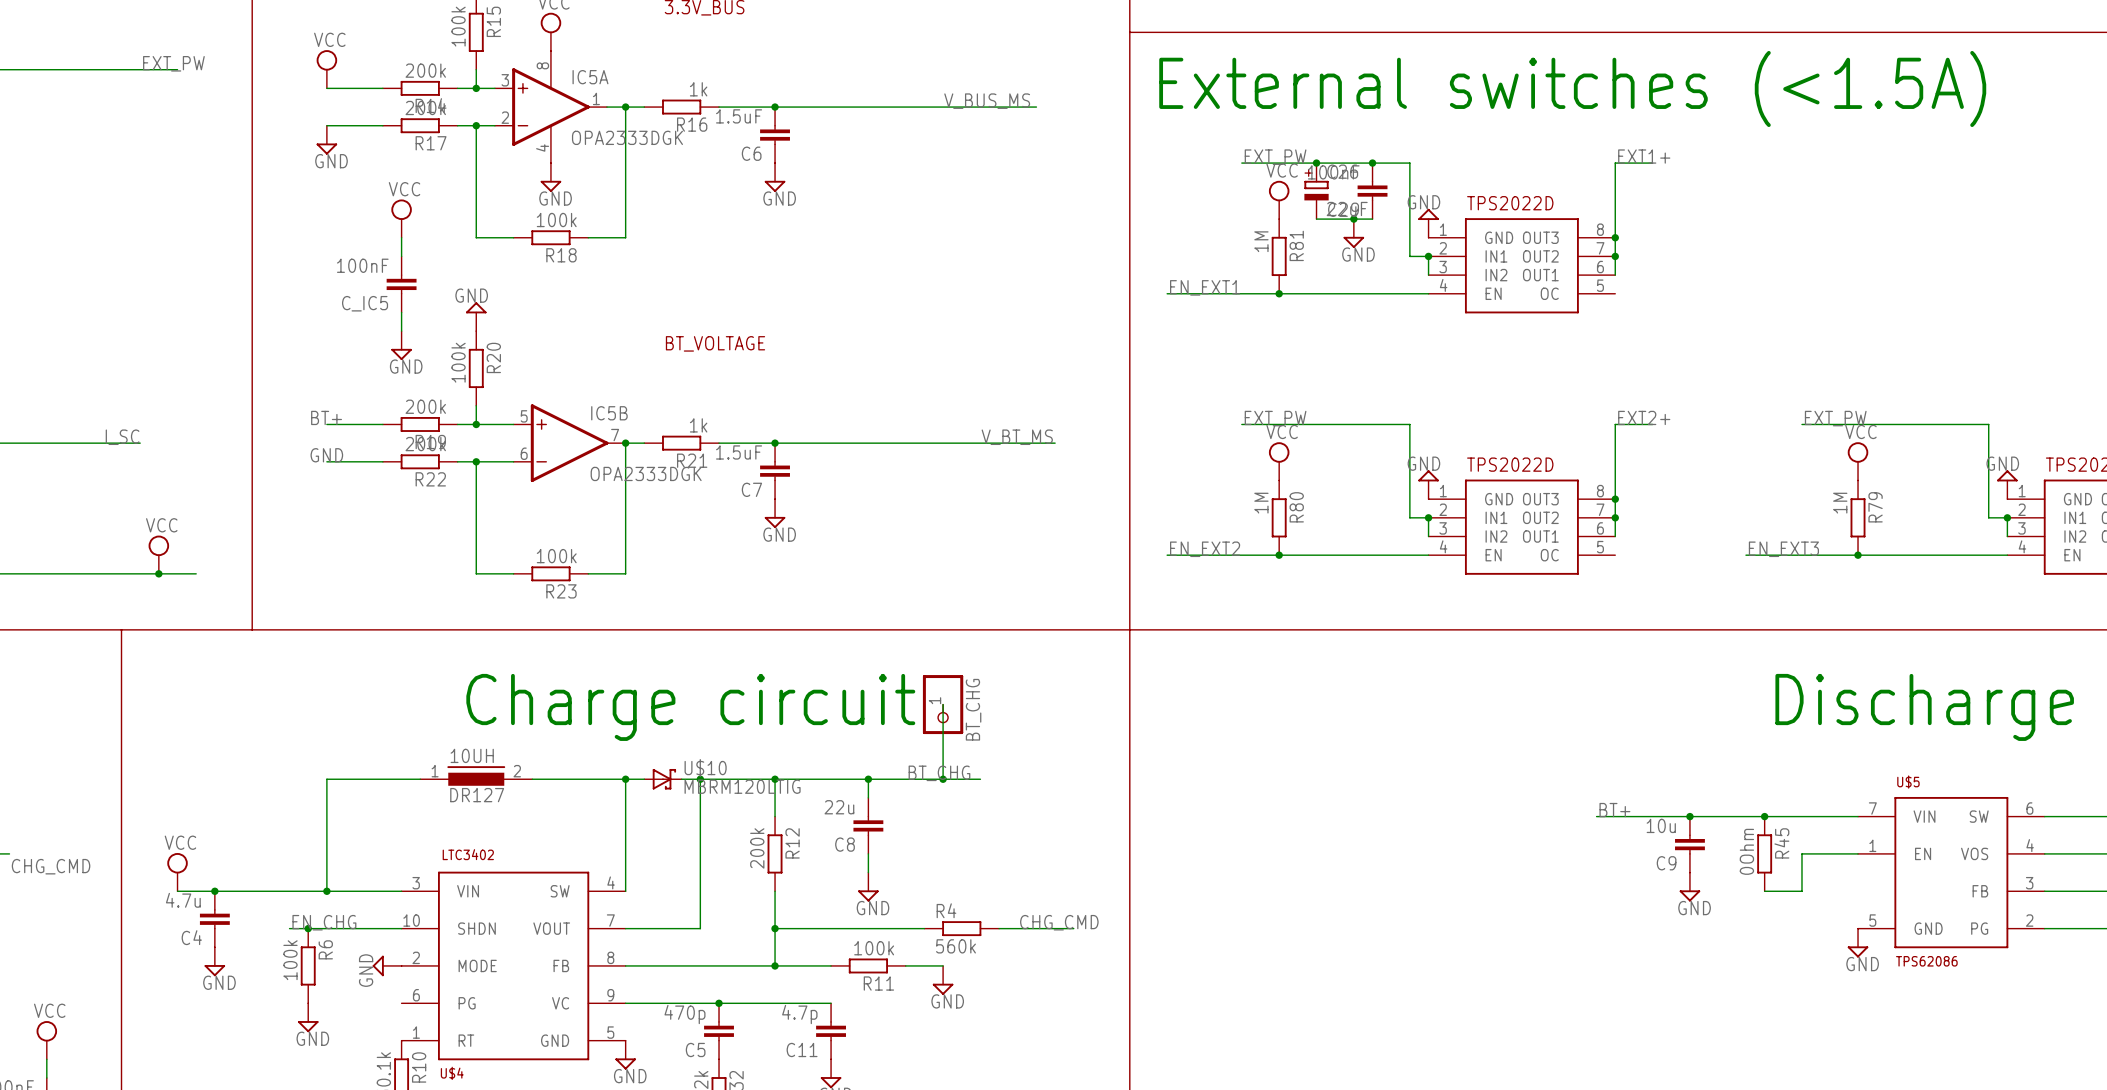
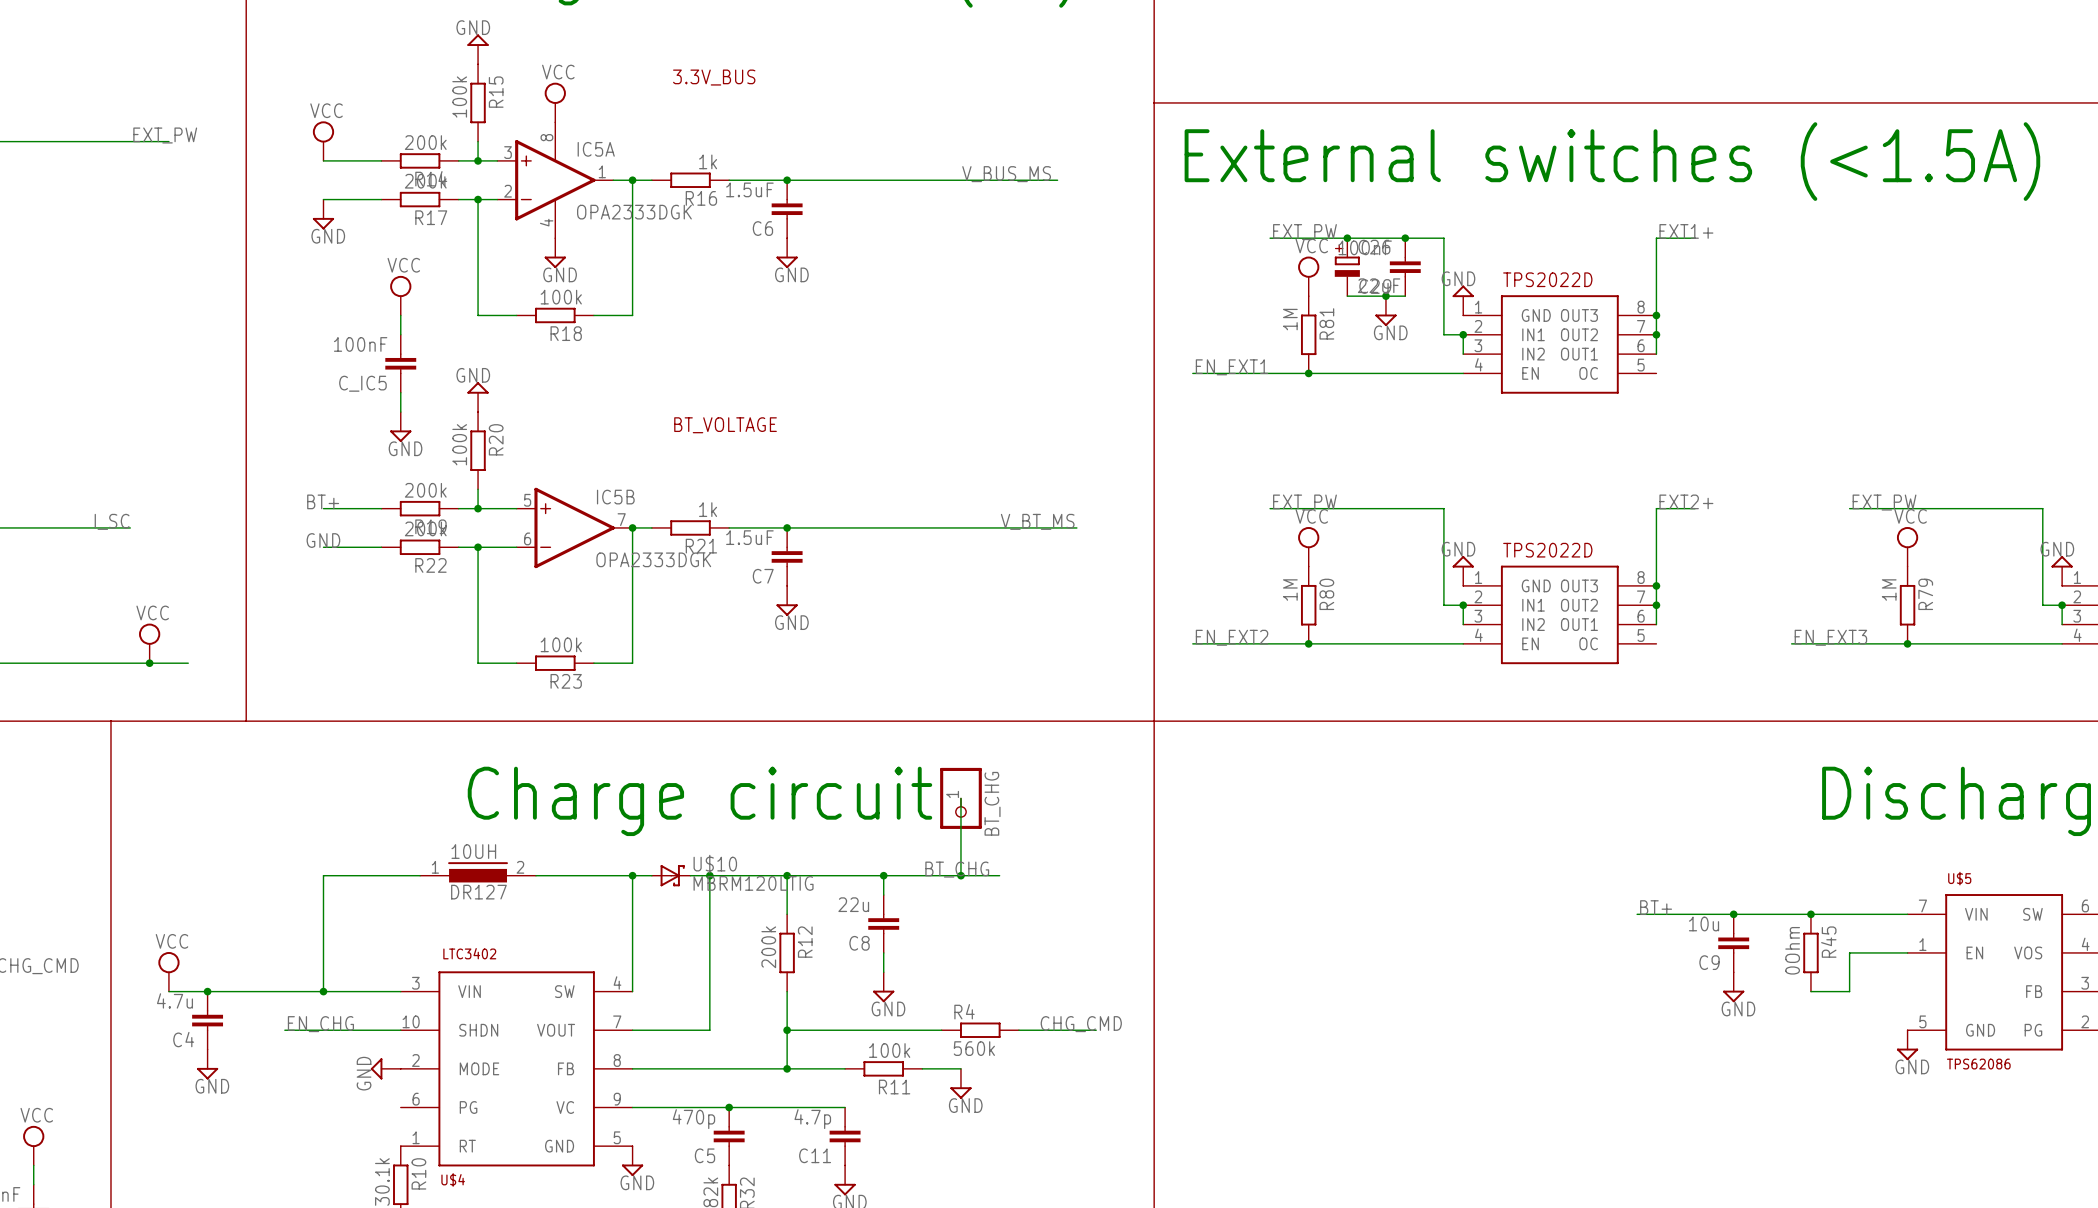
junction: (308, 928) -> none
R6: 100k (308, 965) -> none
power symbol: GND (308, 1017) -> none

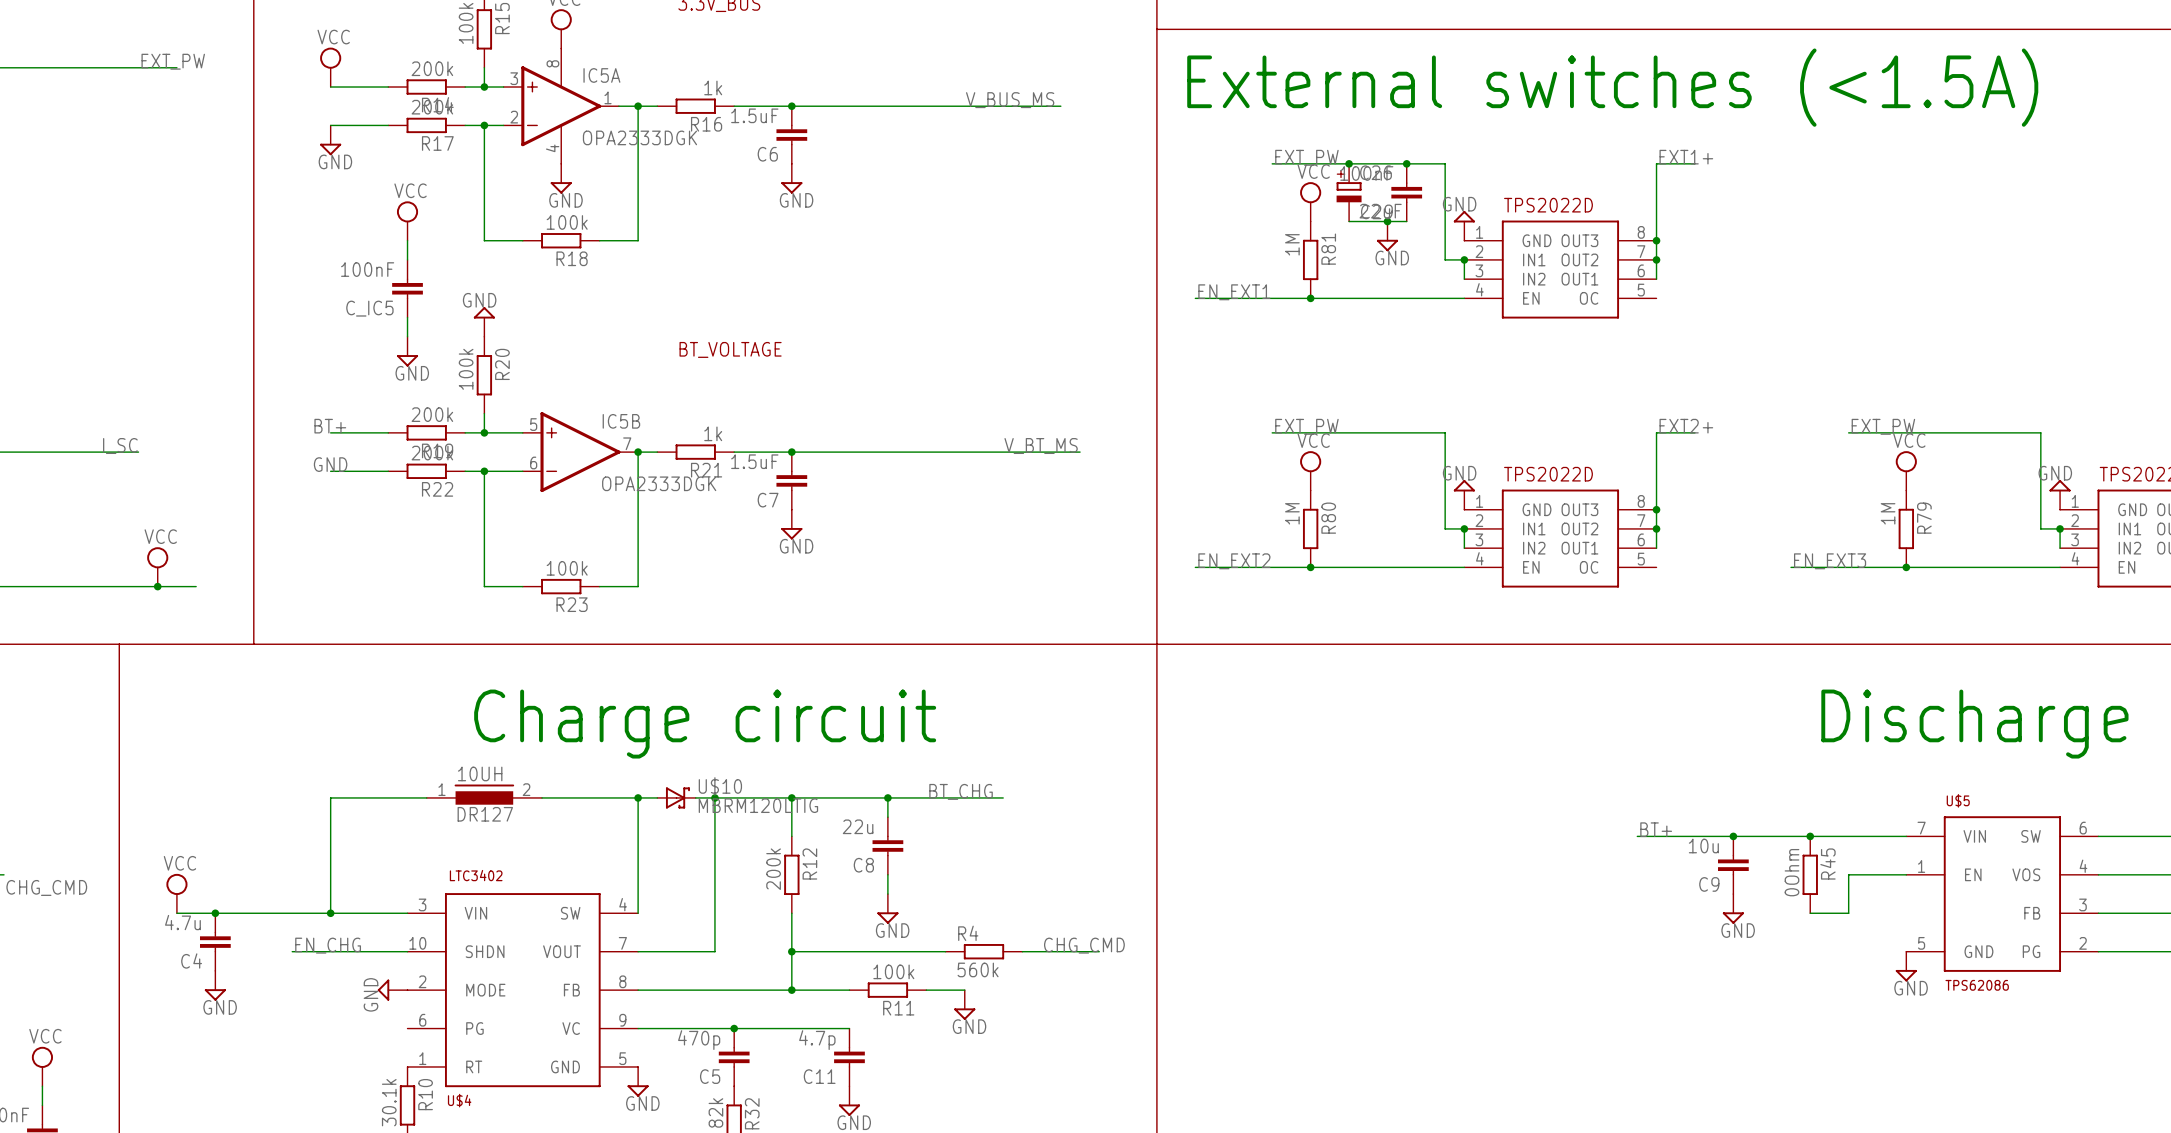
wire: (960, 798) (960, 875) -> none
BT_CHG: (960, 798) -> none
junction: (960, 875) -> none

